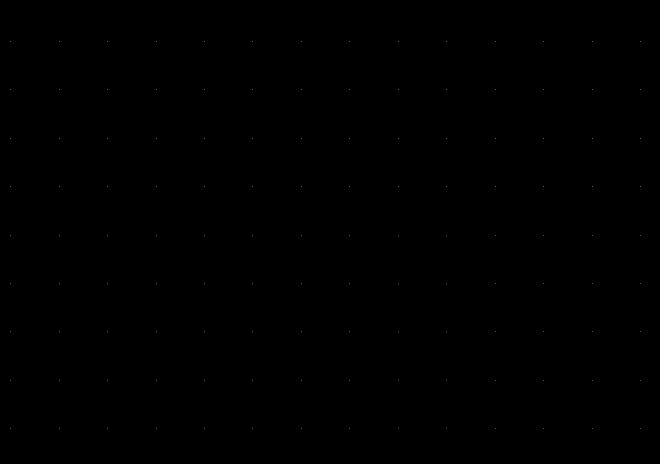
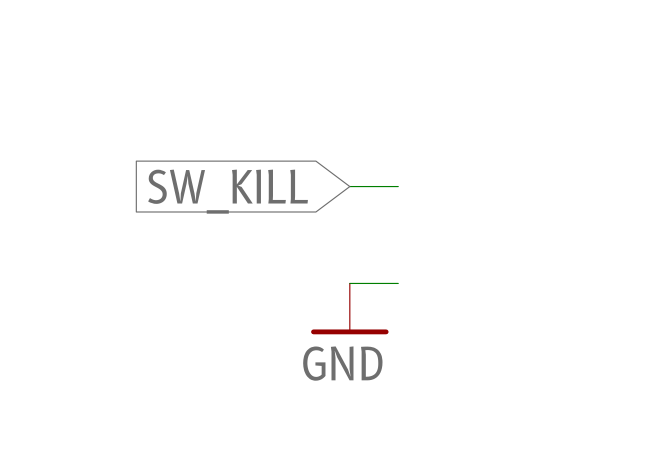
wire: none -> (349, 186) (398, 186)
global label: none -> SW_KILL (228, 191)
wire: none -> (349, 283) (398, 283)
power symbol: none -> GND (349, 308)

